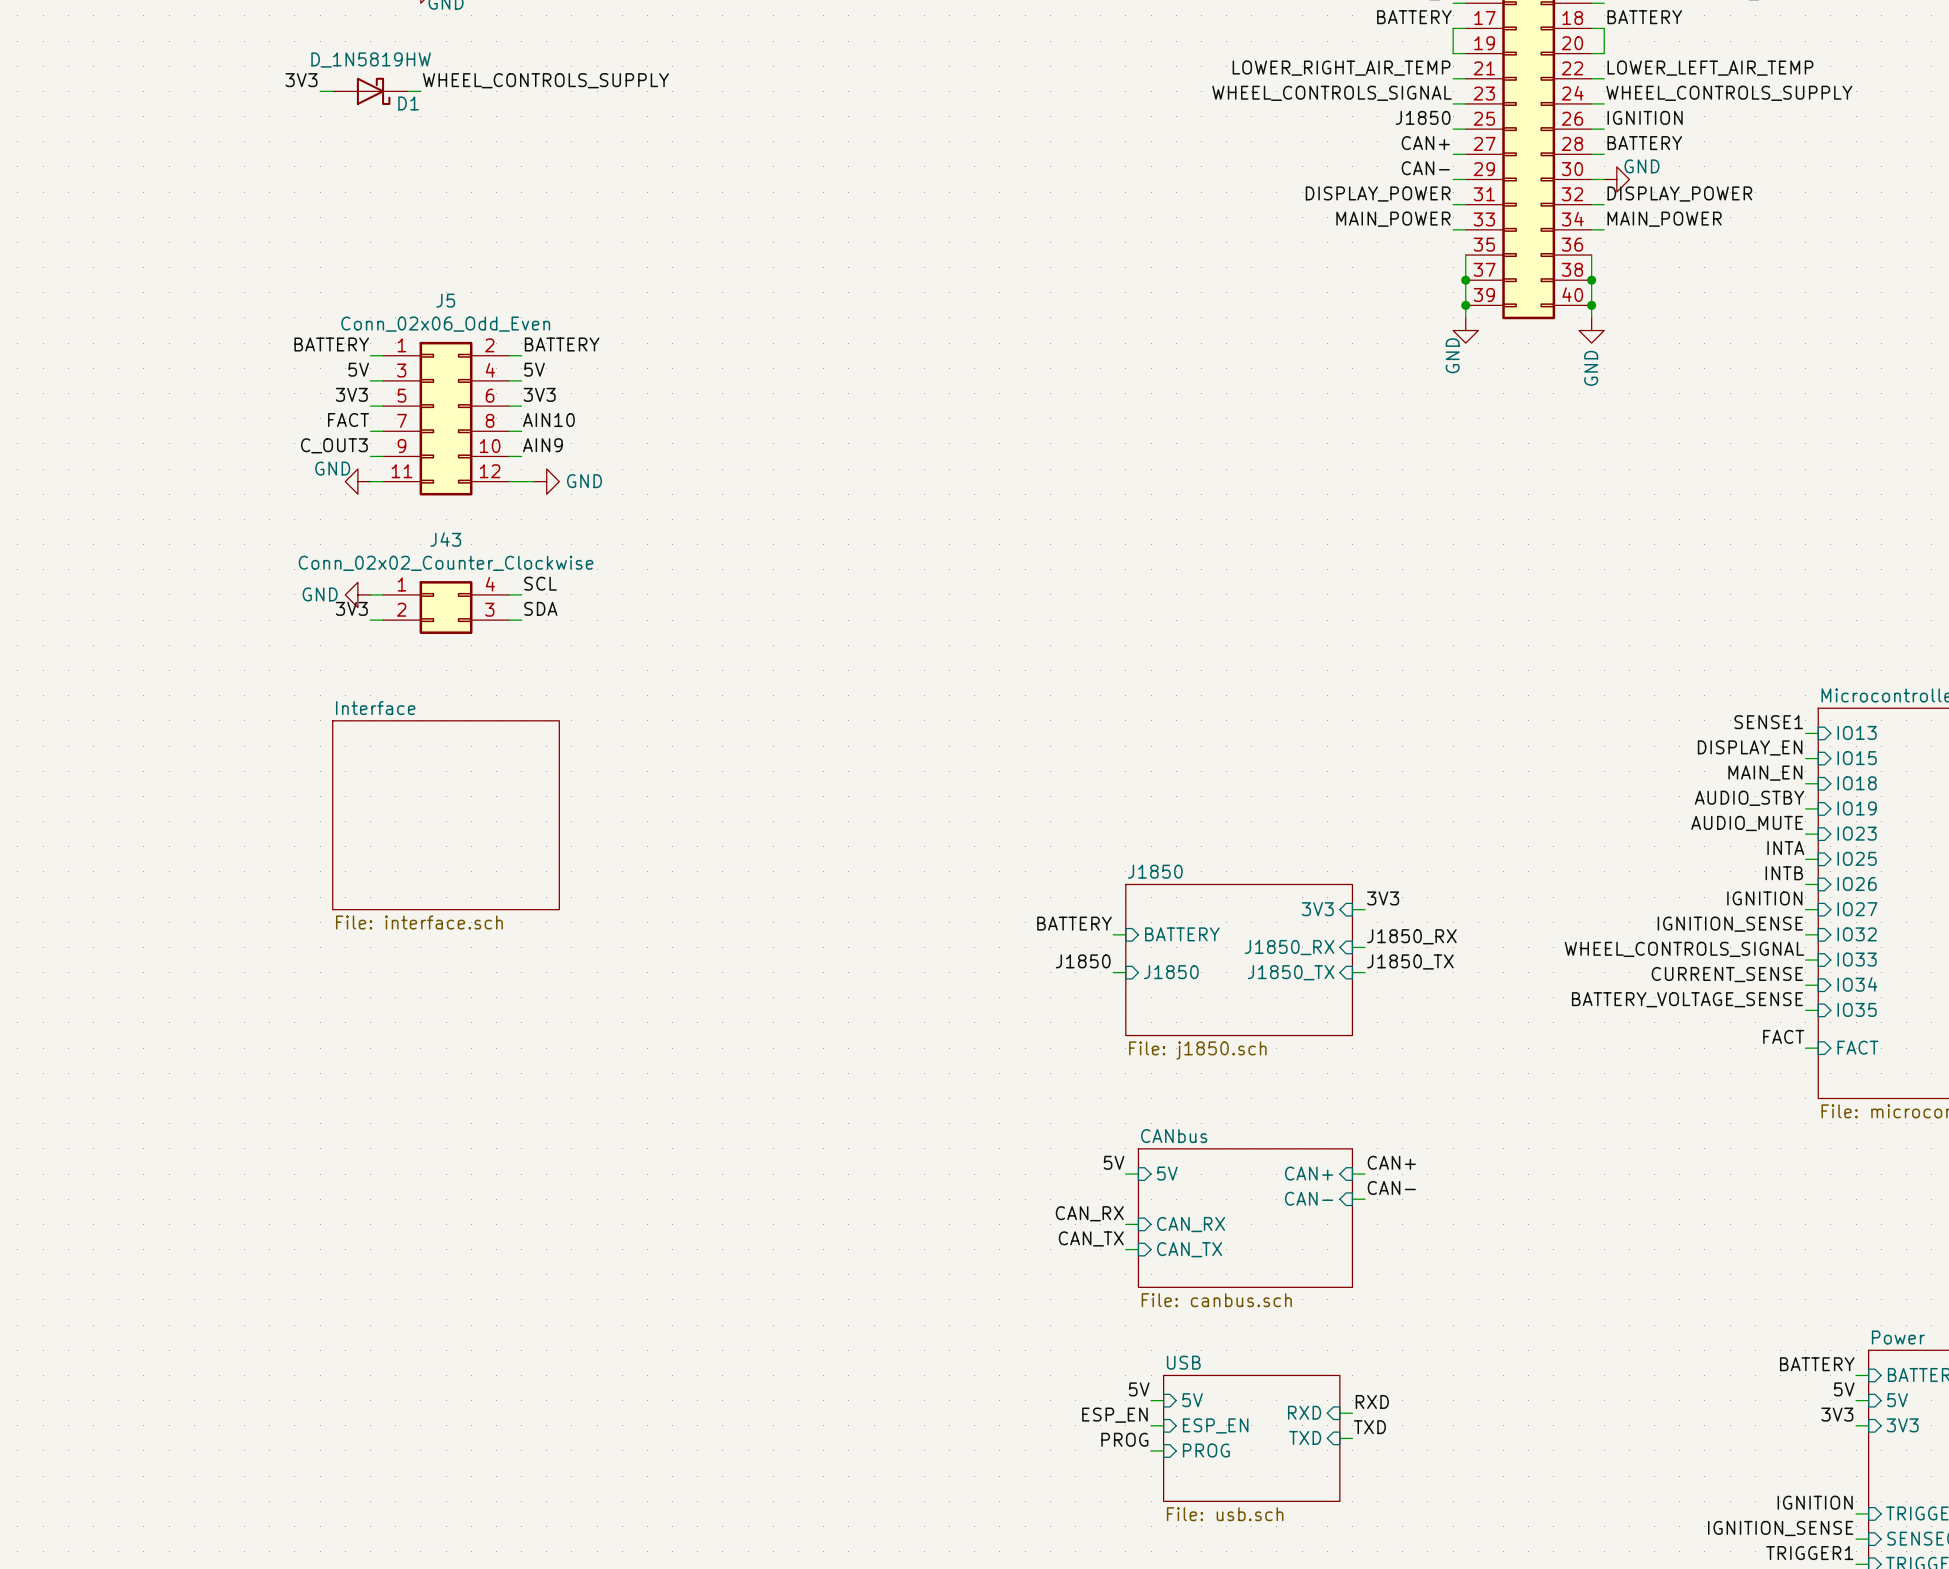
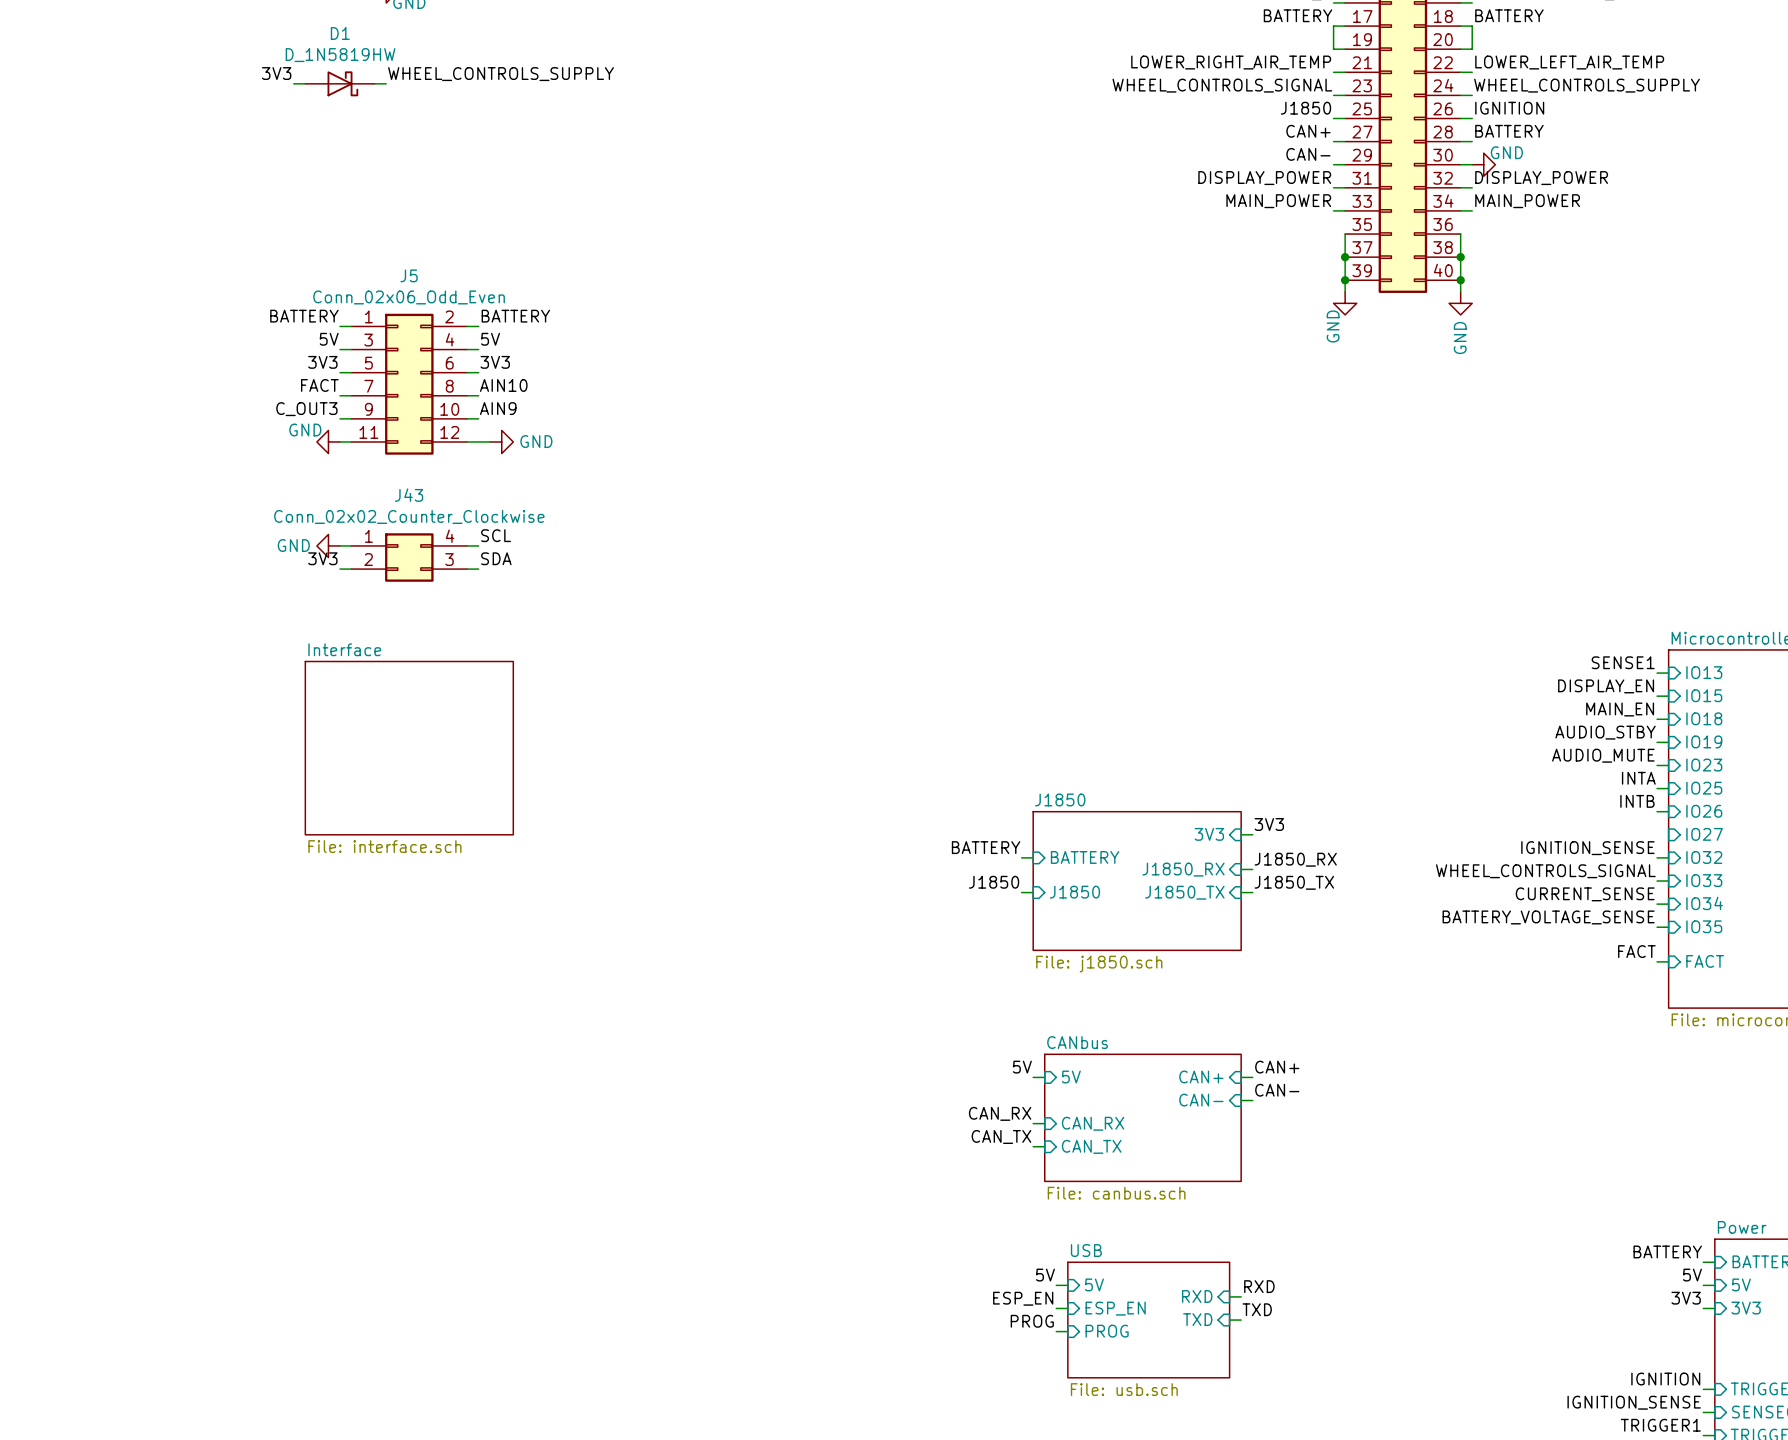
D1 name position: D1 (408, 103) -> D1 (340, 33)
label: IGNITION (1764, 898) -> none
wire: (1805, 909) (1818, 909) -> none

